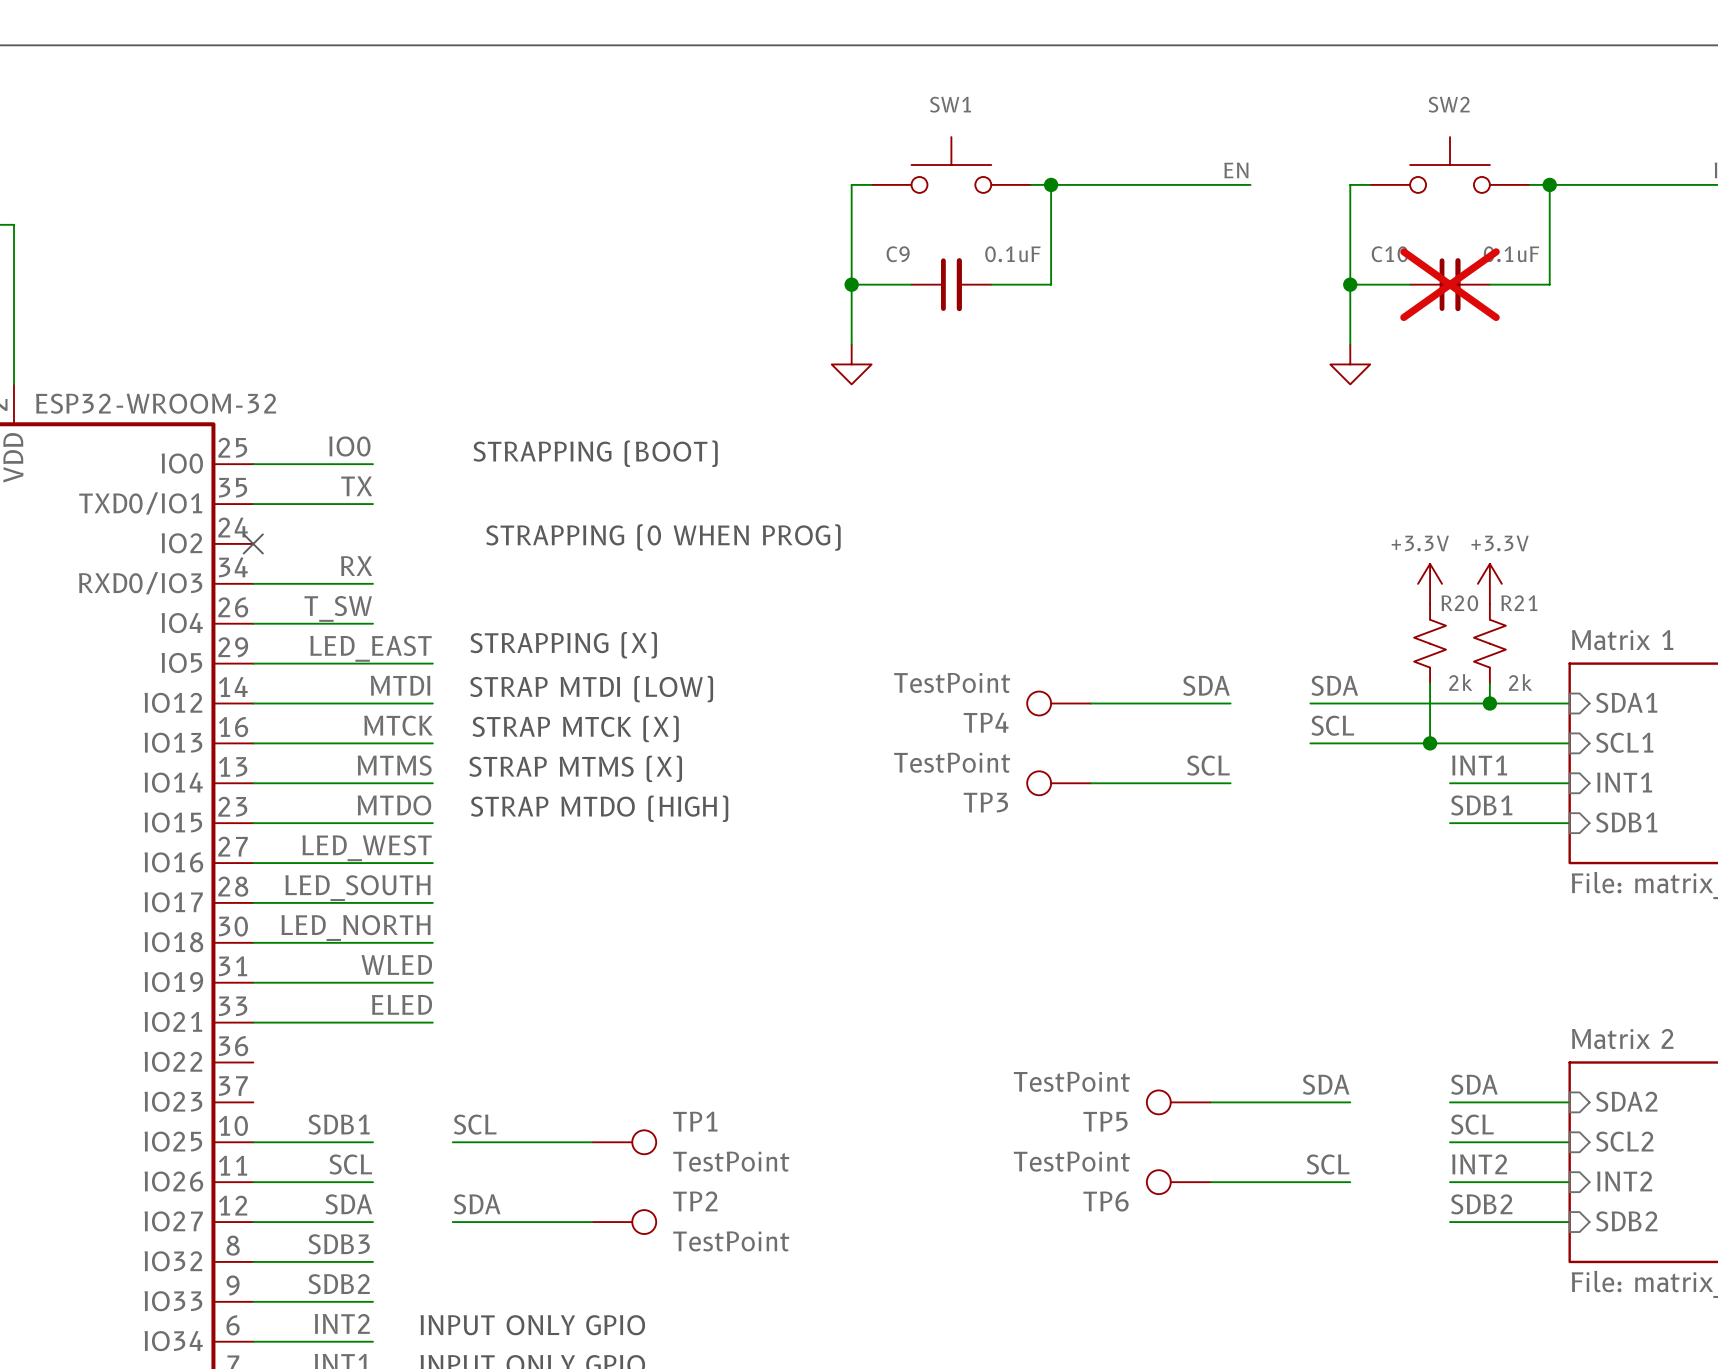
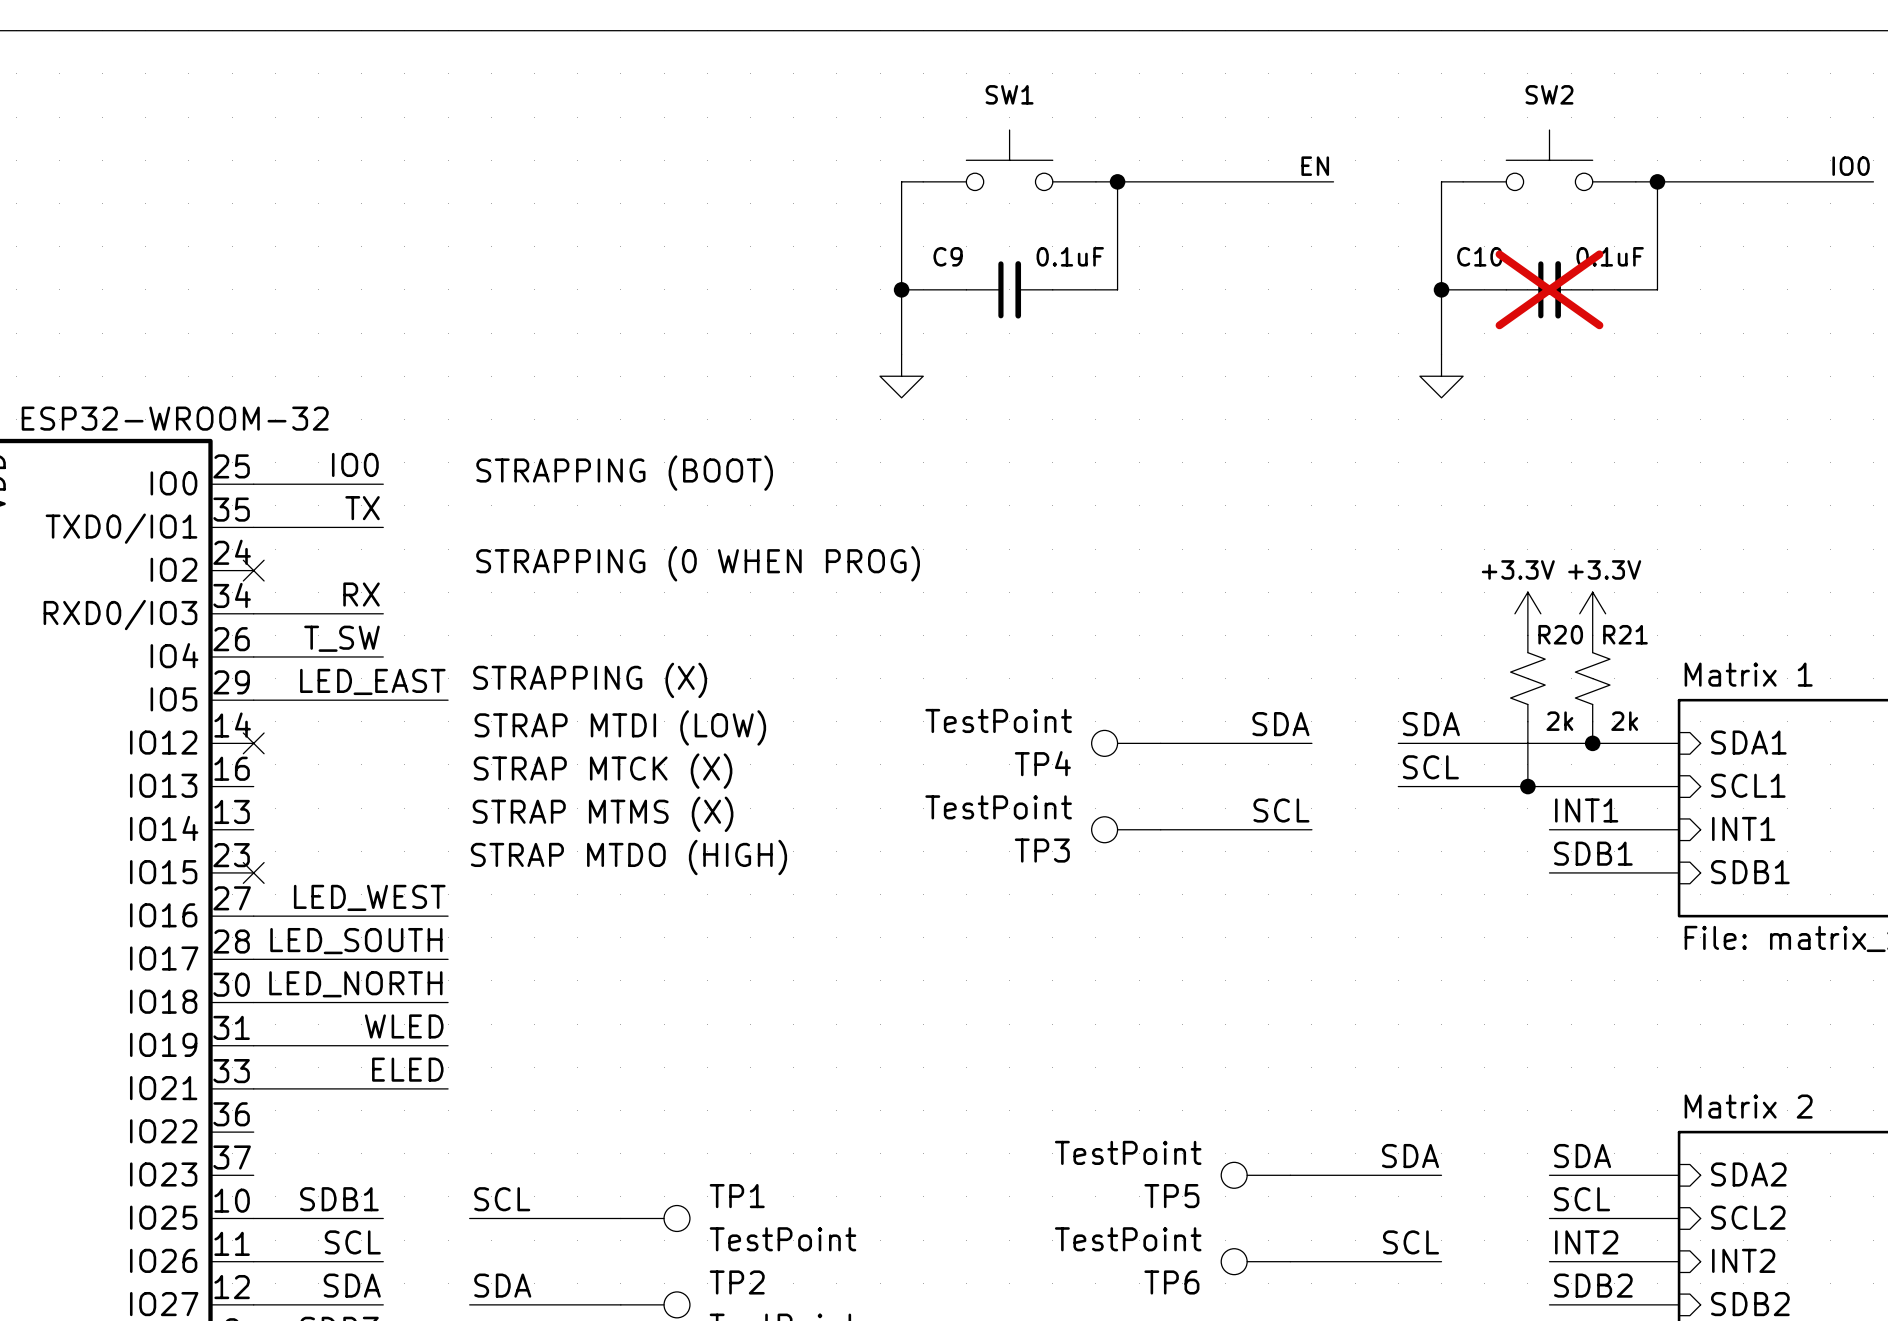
label: MTDI (400, 685) -> none
wire: (253, 703) (432, 703) -> none
no-connect mark: none -> (253, 743)
label: MTCK (398, 725) -> none
wire: (253, 743) (432, 743) -> none
label: MTMS (394, 765) -> none
wire: (253, 783) (432, 783) -> none
label: MTDO (394, 805) -> none
wire: (253, 823) (432, 823) -> none
no-connect mark: none -> (253, 872)

